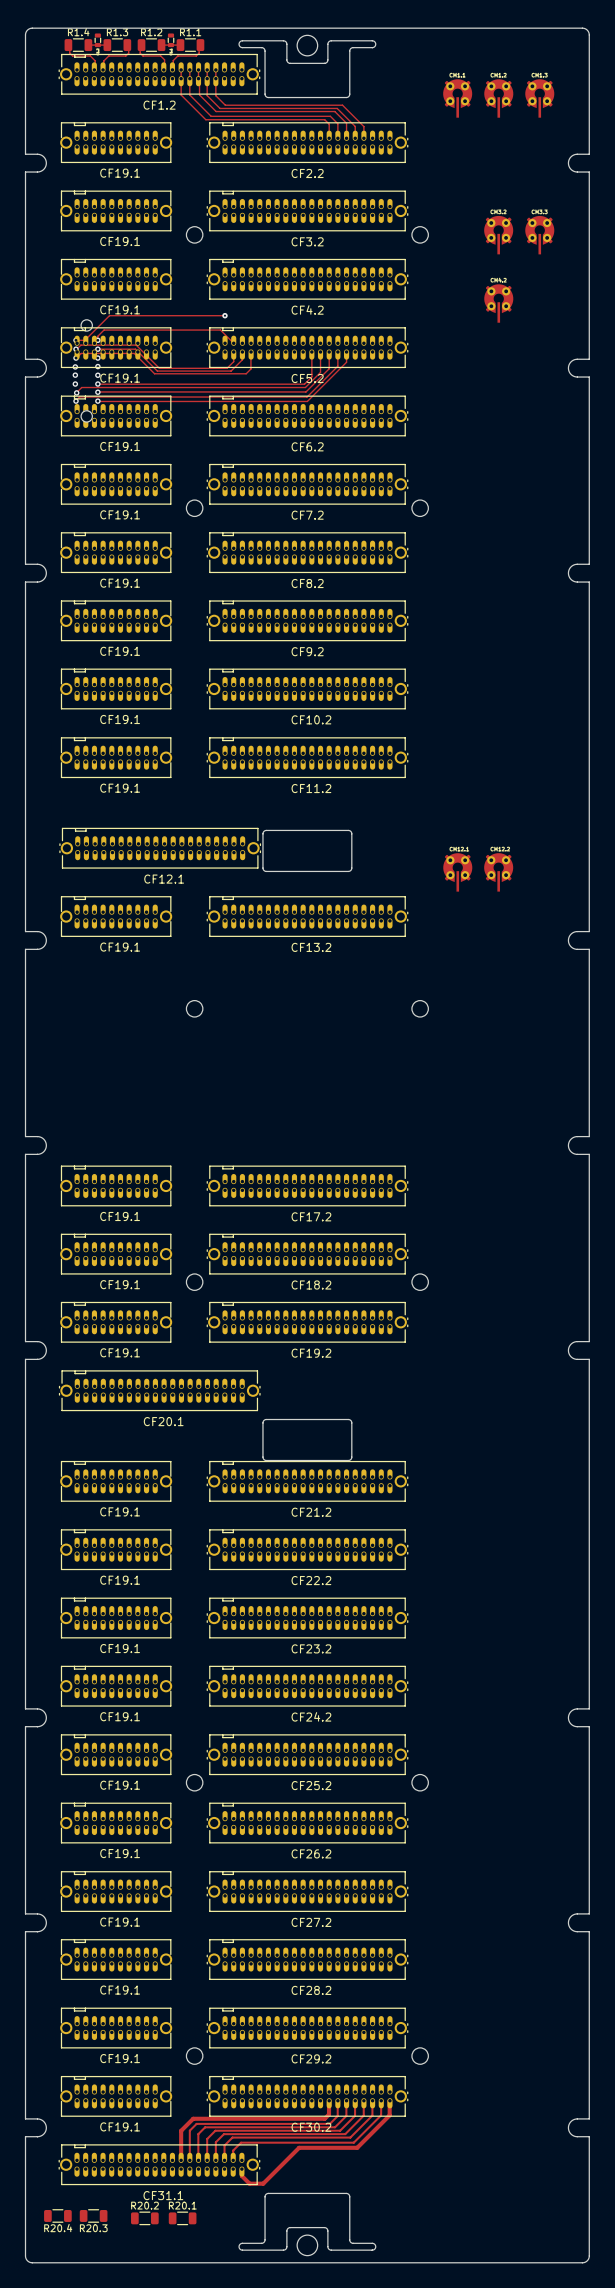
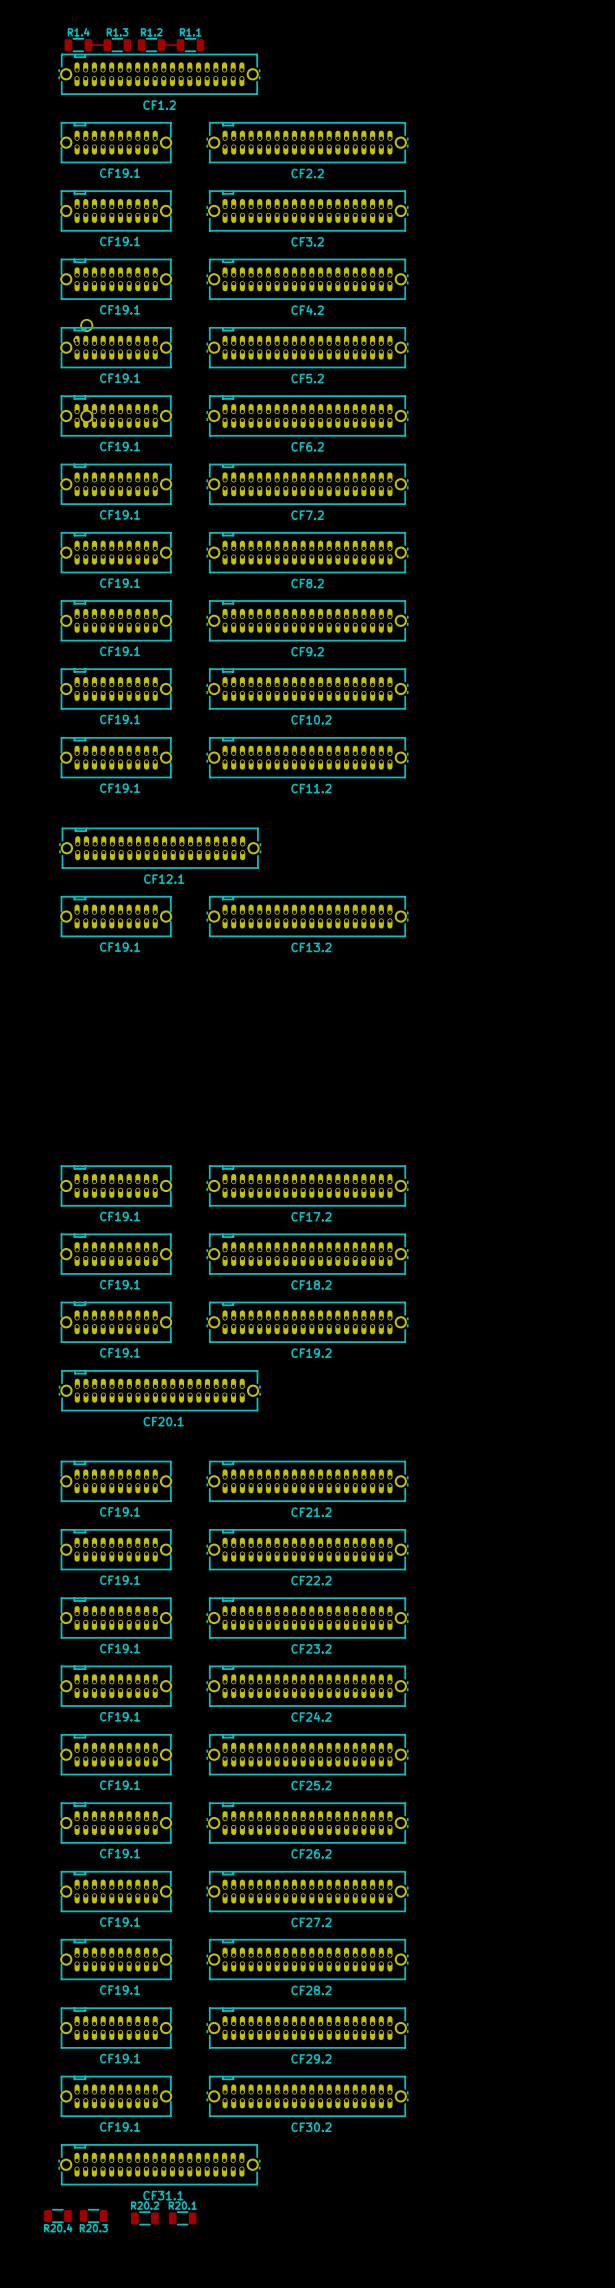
board edge: (32, 28) (582, 28) (589, 33) (589, 154) (573, 154) (568, 163) (573, 171) (589, 172) (589, 359) (573, 359) (568, 368) (573, 376) (589, 377) (589, 564) (573, 564) (568, 573) (573, 581) (589, 582) (589, 931) (573, 932) (568, 940) (573, 948) (589, 949) (589, 1136) (573, 1137) (568, 1145) (573, 1153) (589, 1154) (589, 1341) (573, 1342) (568, 1350) (573, 1358) (589, 1359) (589, 1708) (573, 1709) (568, 1717) (573, 1726) (589, 1726) (589, 1913) (573, 1914) (568, 1922) (573, 1931) (589, 1931) (589, 2118) (573, 2119) (568, 2127) (573, 2136) (589, 2136) (589, 2255) (583, 2262) (32, 2262) (25, 2257) (25, 2136) (40, 2136) (46, 2127) (40, 2119) (25, 2118) (25, 1931) (40, 1931) (44, 1927) (46, 1922) (44, 1917) (40, 1914) (25, 1913) (25, 1726) (40, 1726) (46, 1717) (40, 1709) (25, 1708) (25, 1359) (40, 1358) (46, 1350) (40, 1342) (25, 1341) (25, 1154) (40, 1153) (46, 1145) (40, 1137) (25, 1136) (25, 949) (40, 948) (46, 940) (40, 932) (25, 931) (25, 582) (40, 581) (44, 578) (46, 573) (44, 568) (40, 564) (25, 564) (25, 377) (40, 376) (44, 373) (46, 368) (44, 363) (40, 359) (25, 359) (25, 172) (40, 171) (46, 163) (40, 154) (25, 154) (25, 35) (27, 30) (32, 28) -> none
round board edge: [297, 35, 318, 56] -> none
part: (97, 40) -> none
part: (171, 40) -> none
track: (69, 45) (69, 53) (72, 56) (90, 56) (95, 60) (95, 69) -> none
track: (128, 45) (128, 53) (125, 56) (108, 56) (103, 61) (103, 69) -> none
track: (140, 45) (140, 53) (142, 56) (160, 56) (164, 59) (164, 69) -> none
track: (199, 45) (199, 53) (196, 56) (177, 56) (173, 60) (173, 69) -> none
board edge: (324, 63) (324, 63) (325, 63) (326, 62) (327, 60) (327, 43) (330, 41) (372, 40) (375, 42) (373, 47) (350, 49) (349, 94) (346, 97) (266, 97) (265, 94) (264, 49) (241, 47) (239, 43) (242, 40) (284, 40) (286, 43) (288, 62) (290, 63) (325, 63) -> none
track: (181, 69) (181, 95) (205, 119) (324, 119) (329, 124) (329, 138) -> none
track: (189, 69) (189, 94) (210, 116) -> none
track: (198, 69) (199, 94) (216, 111) (334, 111) (346, 123) (346, 138) -> none
track: (207, 69) (207, 95) (220, 108) (337, 108) (355, 126) (355, 138) -> none
track: (215, 69) (215, 95) (225, 105) (342, 105) (363, 126) (363, 138) -> none
part: (457, 98) -> none
part: (498, 98) -> none
part: (539, 98) -> none
track: (211, 116) (330, 116) (337, 123) (337, 138) -> none
round board edge: [186, 226, 203, 244] -> none
round board edge: [411, 226, 429, 244] -> none
part: (498, 235) -> none
part: (539, 235) -> none
part: (498, 303) -> none
via: (224, 315) -> none
track: (225, 315) (109, 315) (84, 340) (76, 340) -> none
track: (97, 340) (97, 336) (104, 330) (220, 330) (233, 343) -> none
via: (97, 340) -> none
track: (76, 349) (80, 345) (136, 345) (159, 368) (227, 368) (233, 361) (233, 351) -> none
via: (76, 349) -> none
track: (97, 349) (135, 349) (157, 371) (231, 371) (242, 359) (242, 351) -> none
via: (97, 349) -> none
track: (251, 351) (250, 368) (246, 373) (154, 373) (134, 353) (81, 353) (75, 357) -> none
track: (320, 351) (320, 372) (305, 387) (81, 387) (76, 392) -> none
track: (329, 351) (329, 368) (305, 391) (98, 391) -> none
track: (337, 351) (337, 366) (307, 397) (79, 397) (75, 400) -> none
track: (346, 351) (346, 362) (307, 401) (97, 401) -> none
track: (311, 352) (311, 376) (304, 384) (98, 384) -> none
via: (76, 358) -> none
via: (97, 358) -> none
via: (75, 366) -> none
via: (97, 366) -> none
via: (75, 375) -> none
via: (97, 375) -> none
via: (75, 384) -> none
via: (97, 384) -> none
via: (76, 392) -> none
via: (97, 392) -> none
via: (76, 401) -> none
via: (97, 401) -> none
round board edge: [186, 500, 203, 517] -> none
round board edge: [411, 500, 429, 517] -> none
board edge: (266, 830) (349, 830) (351, 833) (351, 869) (348, 871) (265, 871) (262, 868) (262, 833) (266, 830) -> none
part: (457, 872) -> none
part: (498, 872) -> none
round board edge: [186, 1000, 203, 1018] -> none
round board edge: [411, 1000, 429, 1018] -> none
round board edge: [186, 1273, 203, 1291] -> none
round board edge: [411, 1273, 429, 1291] -> none
board edge: (266, 1419) (349, 1419) (351, 1422) (351, 1458) (348, 1460) (264, 1460) (262, 1457) (262, 1422) (266, 1419) -> none
round board edge: [186, 1774, 203, 1791] -> none
round board edge: [411, 1774, 429, 1791] -> none
round board edge: [186, 2047, 203, 2065] -> none
round board edge: [411, 2047, 429, 2065] -> none
track: (329, 2100) (329, 2114) (324, 2118) (193, 2118) (181, 2130) (181, 2160) -> none
track: (337, 2100) (337, 2116) (329, 2123) (196, 2123) (189, 2130) (189, 2160) -> none
track: (346, 2100) (346, 2115) (335, 2127) (205, 2127) (198, 2134) (198, 2160) -> none
track: (355, 2100) (355, 2115) (340, 2130) (215, 2130) (207, 2138) (207, 2160) -> none
track: (372, 2100) (372, 2115) (350, 2137) (232, 2137) (224, 2145) (224, 2160) -> none
track: (381, 2100) (381, 2115) (353, 2142) (241, 2142) (233, 2150) (233, 2160) -> none
track: (389, 2100) (389, 2115) (357, 2147) (299, 2147) (263, 2183) (249, 2183) (241, 2175) (241, 2169) -> none
track: (364, 2101) (363, 2115) (345, 2134) (223, 2134) (215, 2142) (215, 2160) -> none
board edge: (268, 2193) (348, 2193) (349, 2196) (350, 2241) (352, 2243) (373, 2243) (375, 2248) (372, 2250) (330, 2250) (327, 2247) (326, 2228) (290, 2227) (287, 2230) (286, 2247) (284, 2249) (240, 2249) (239, 2246) (241, 2243) (261, 2243) (264, 2241) (265, 2196) (268, 2193) -> none
round board edge: [297, 2235, 318, 2256] -> none

